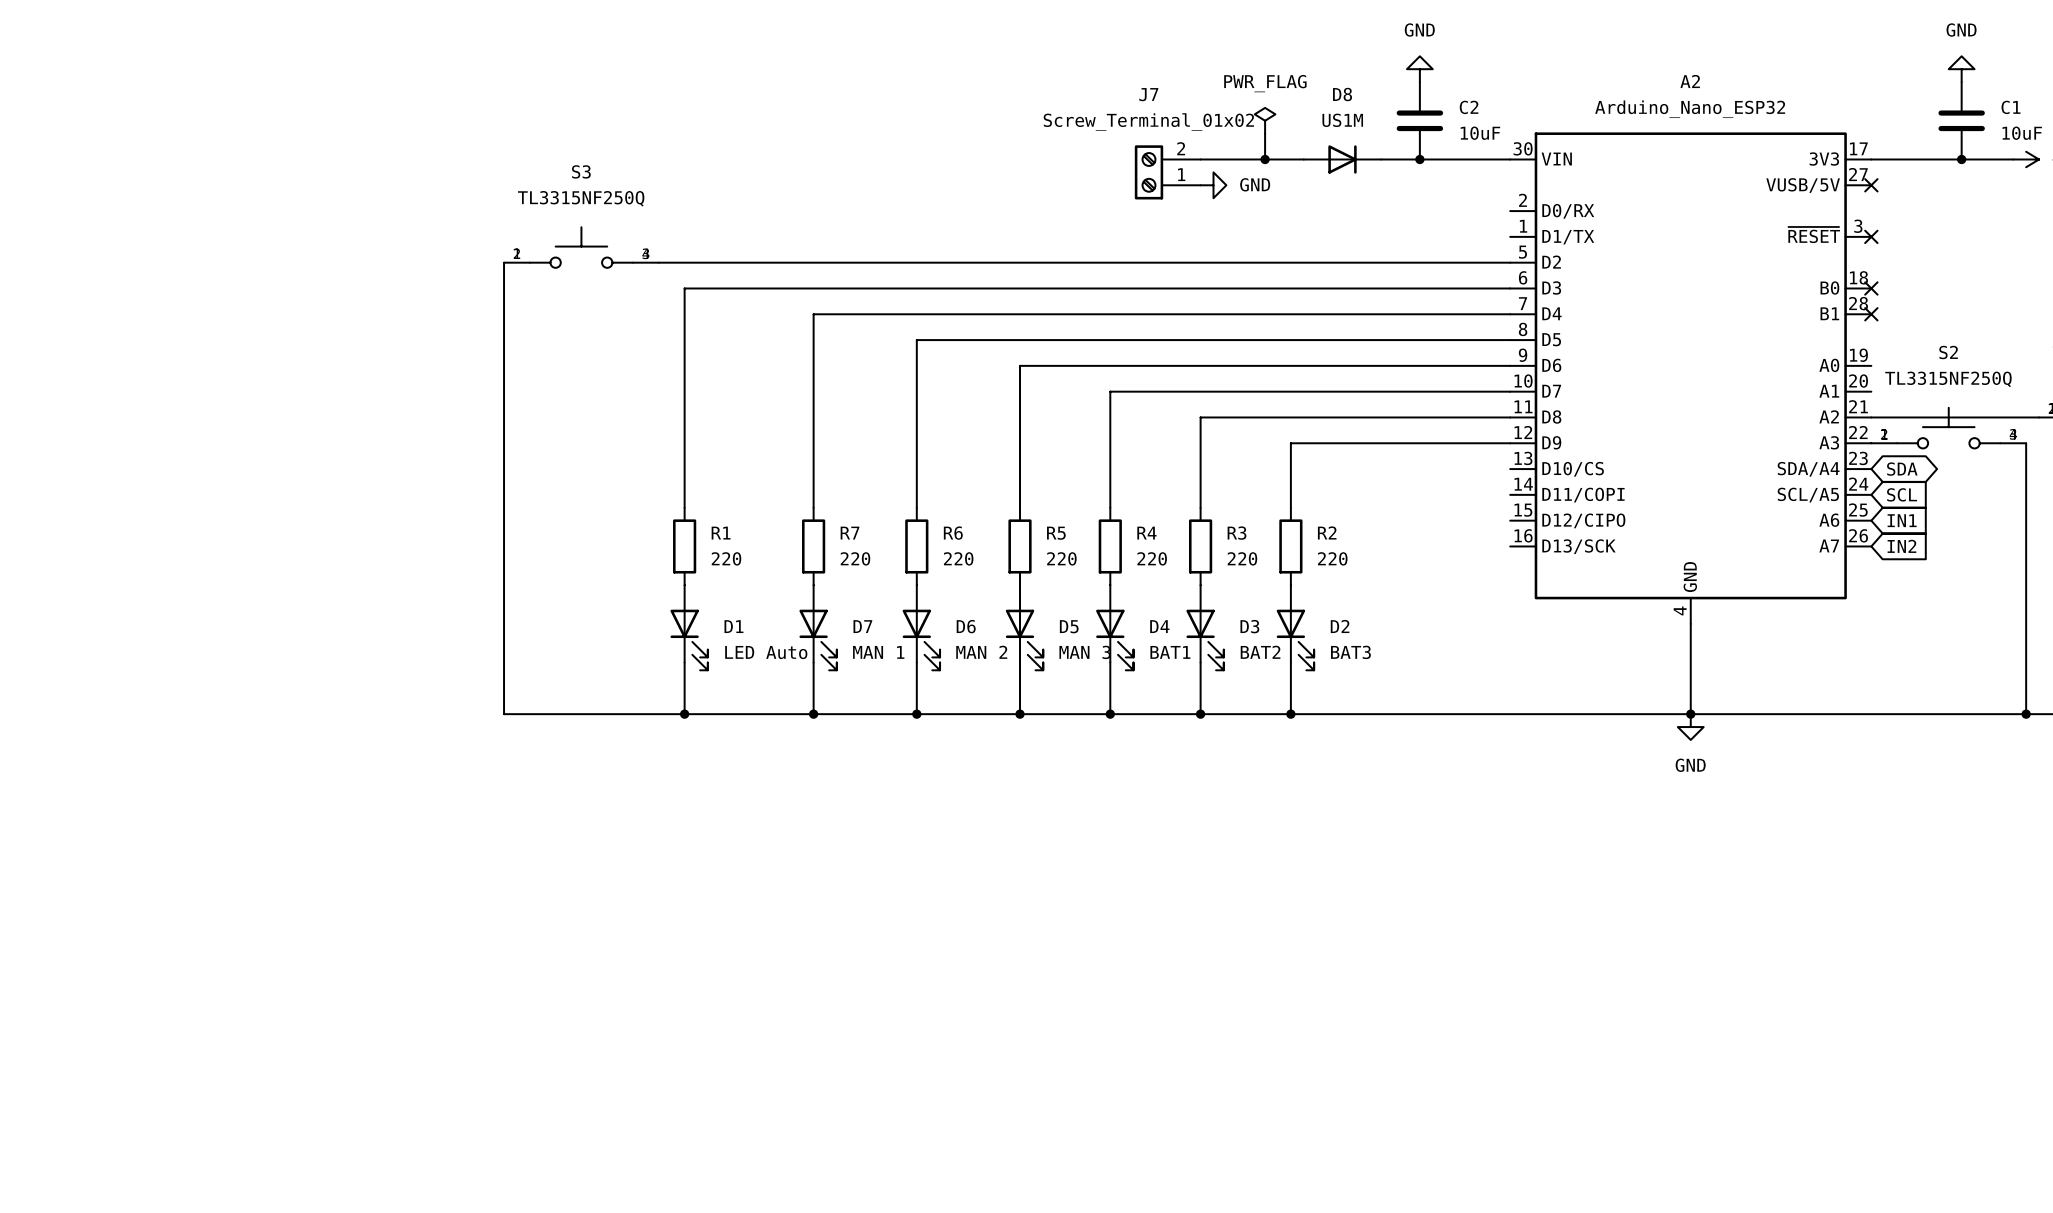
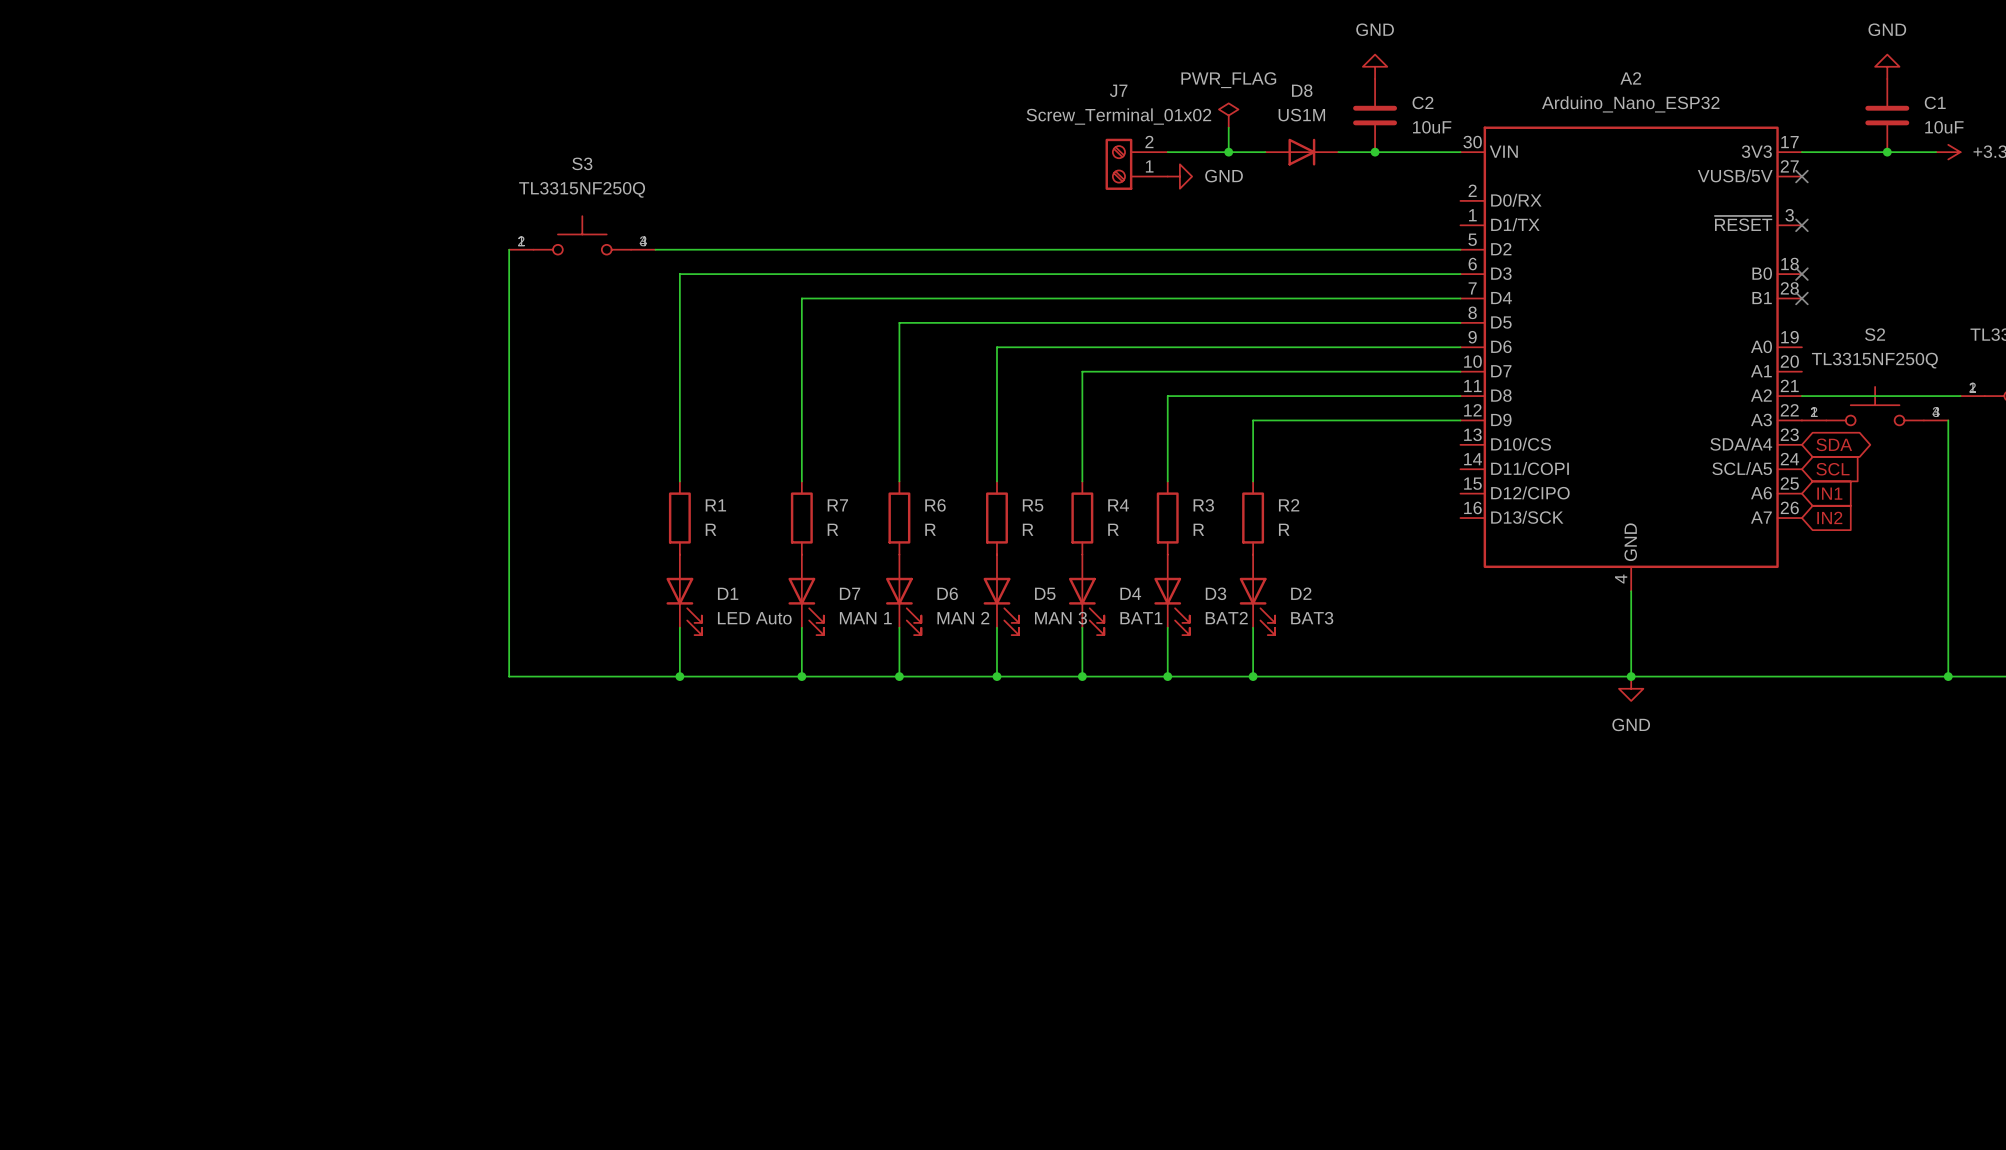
R1 value: 220 (726, 558) -> R (711, 529)
R7 value: 220 (855, 558) -> R (832, 529)
R6 value: 220 (958, 558) -> R (930, 529)
R5 value: 220 (1061, 558) -> R (1028, 529)
R4 value: 220 (1152, 558) -> R (1113, 529)
R3 value: 220 (1242, 558) -> R (1198, 529)
R2 value: 220 (1332, 558) -> R (1284, 529)

